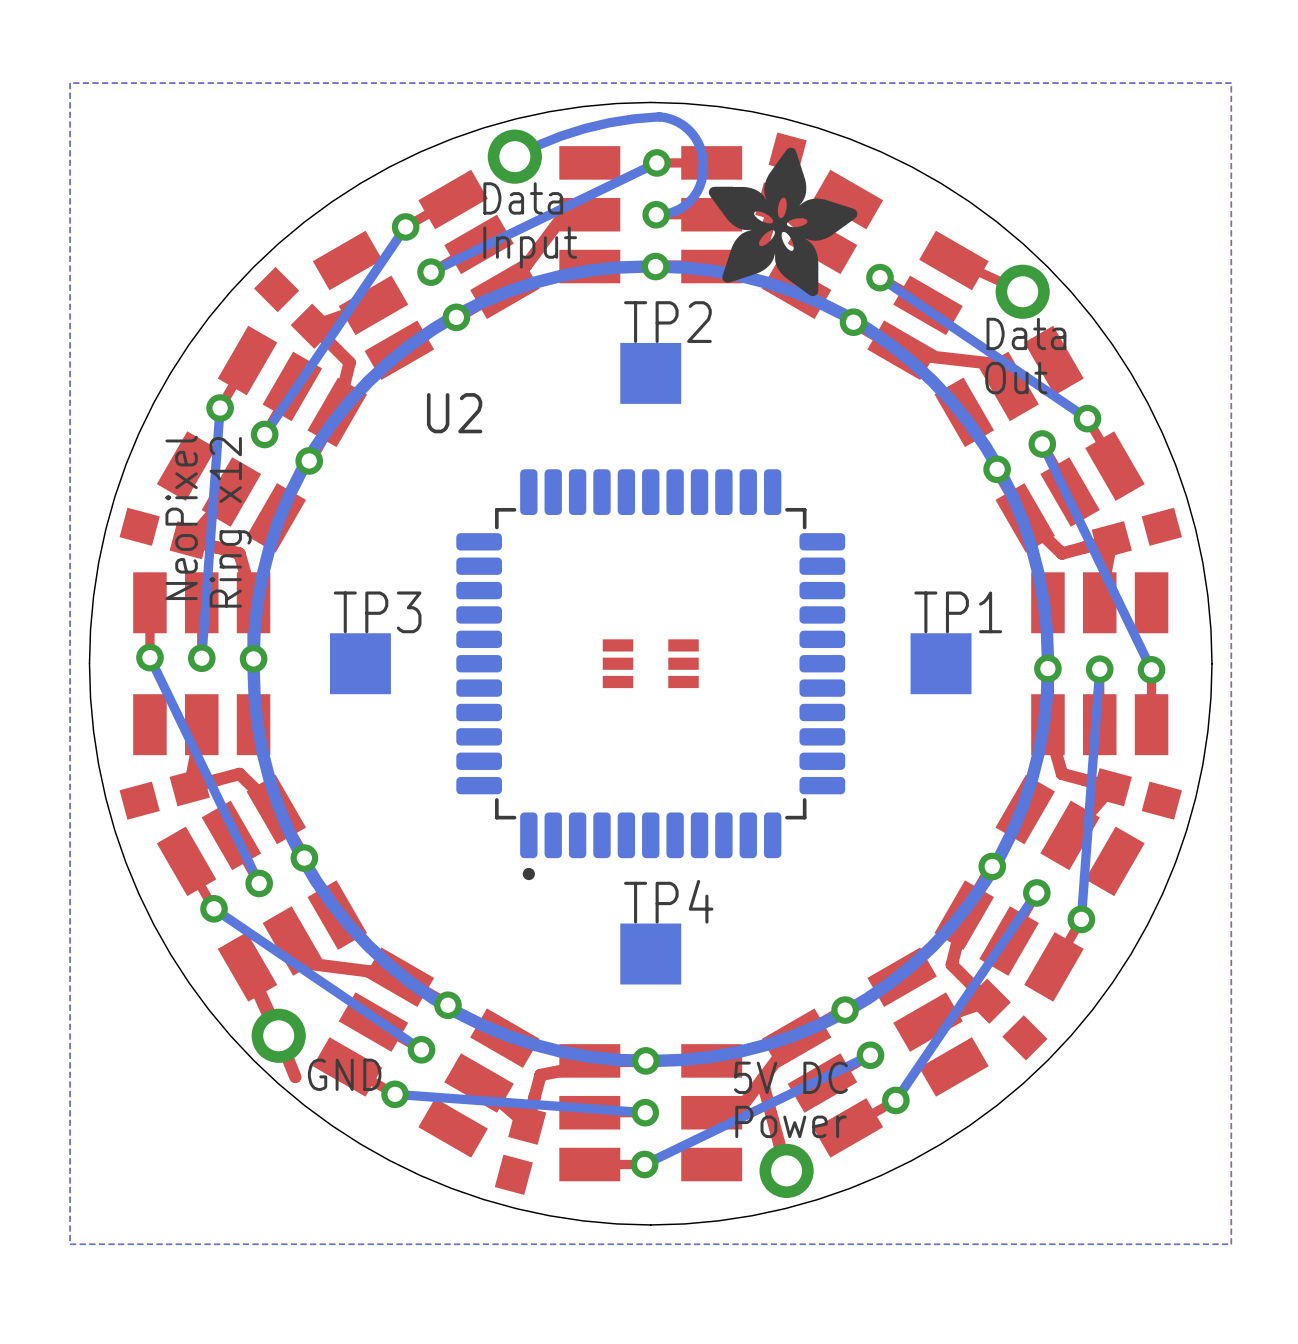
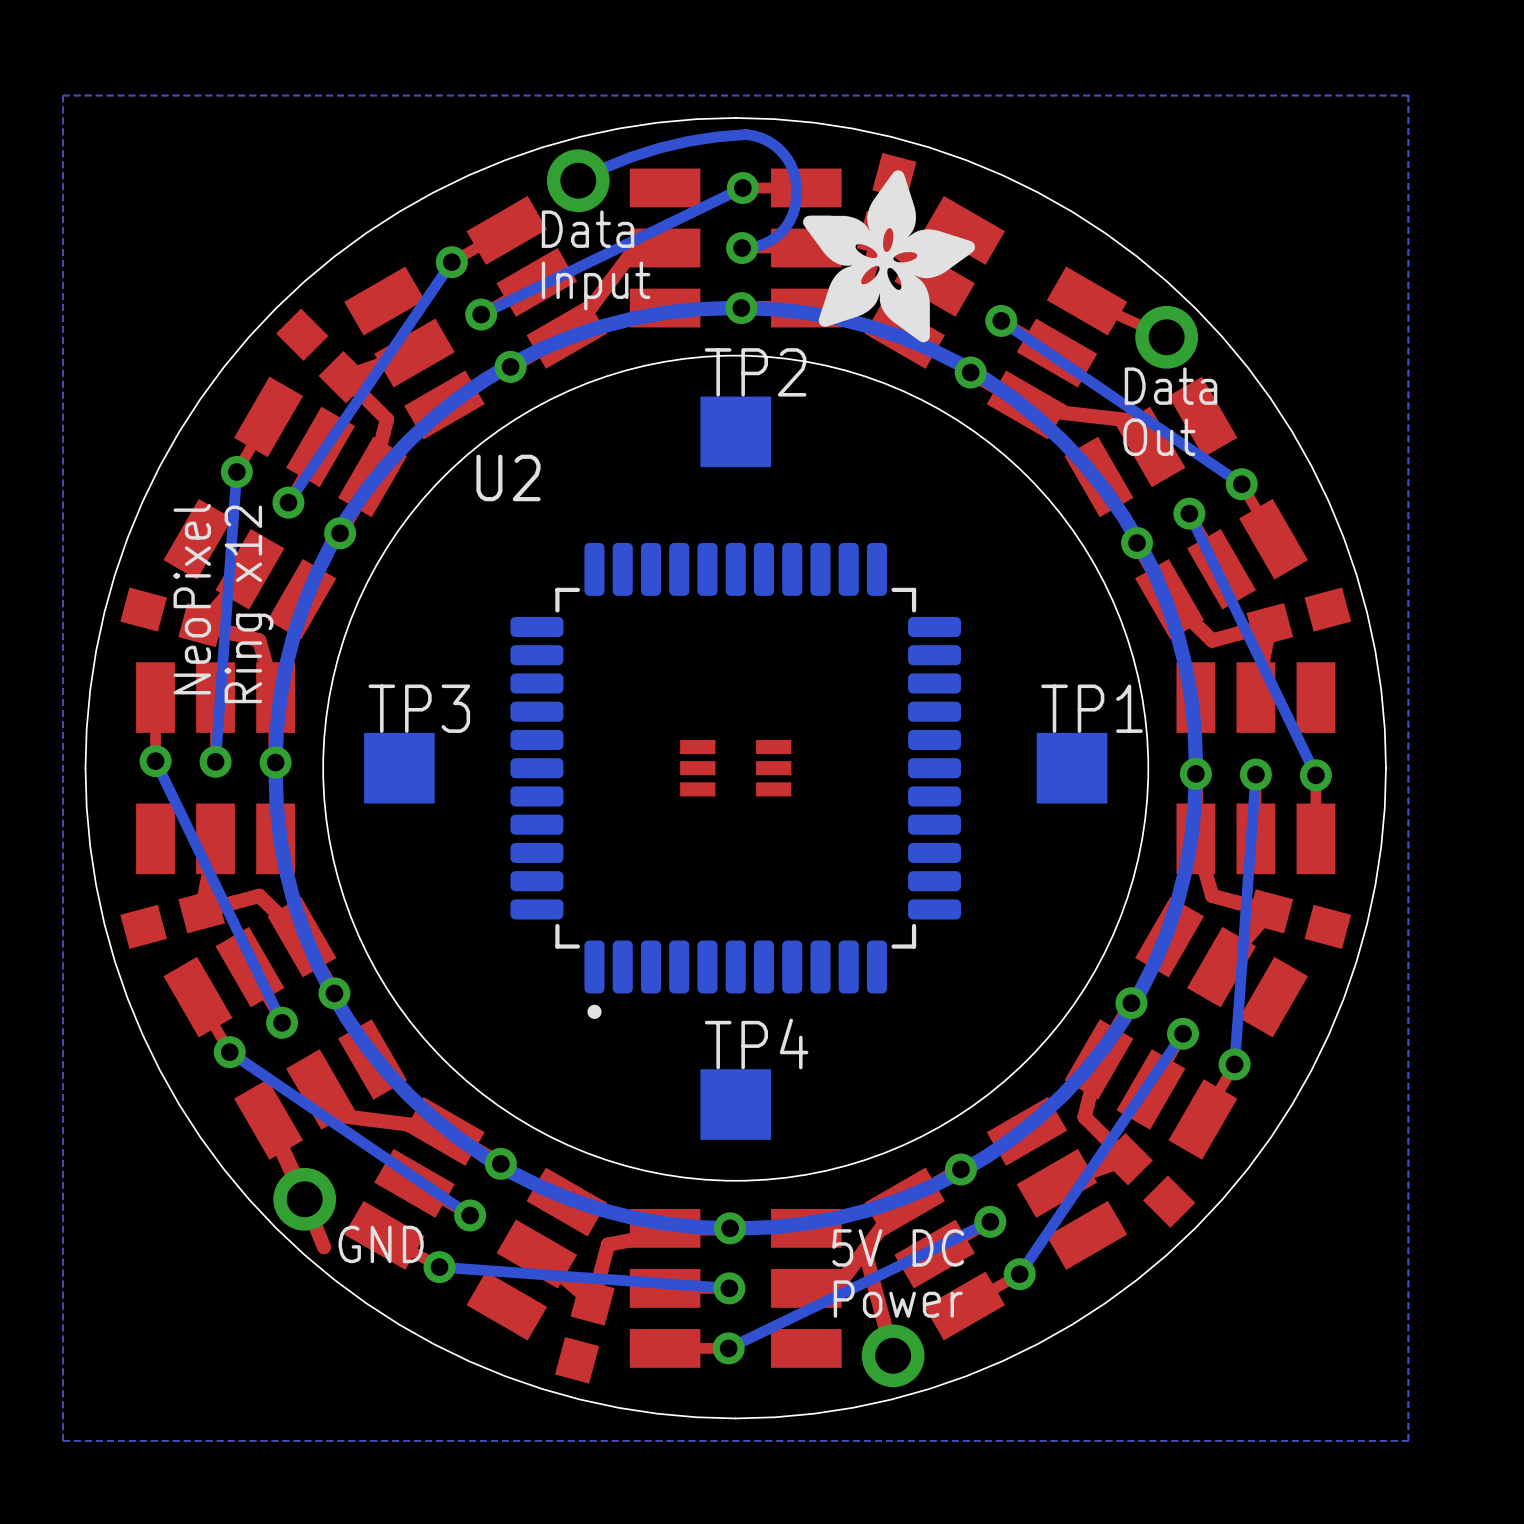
round board edge: none -> [323, 355, 1149, 1181]

